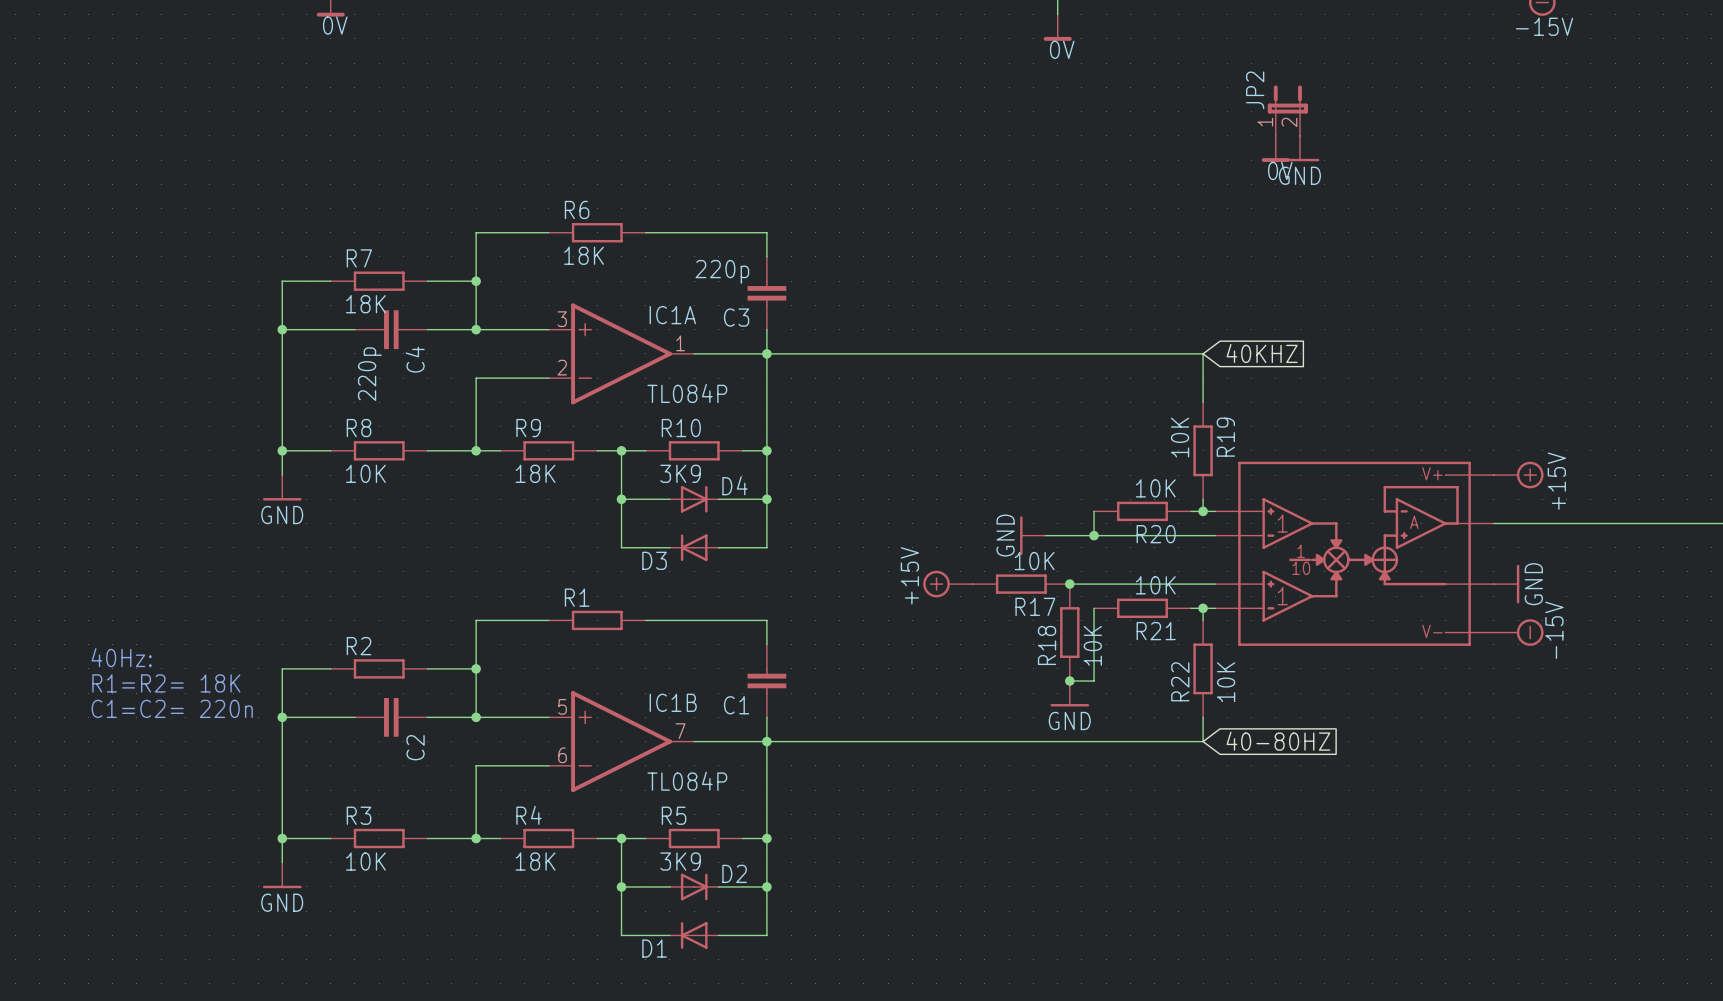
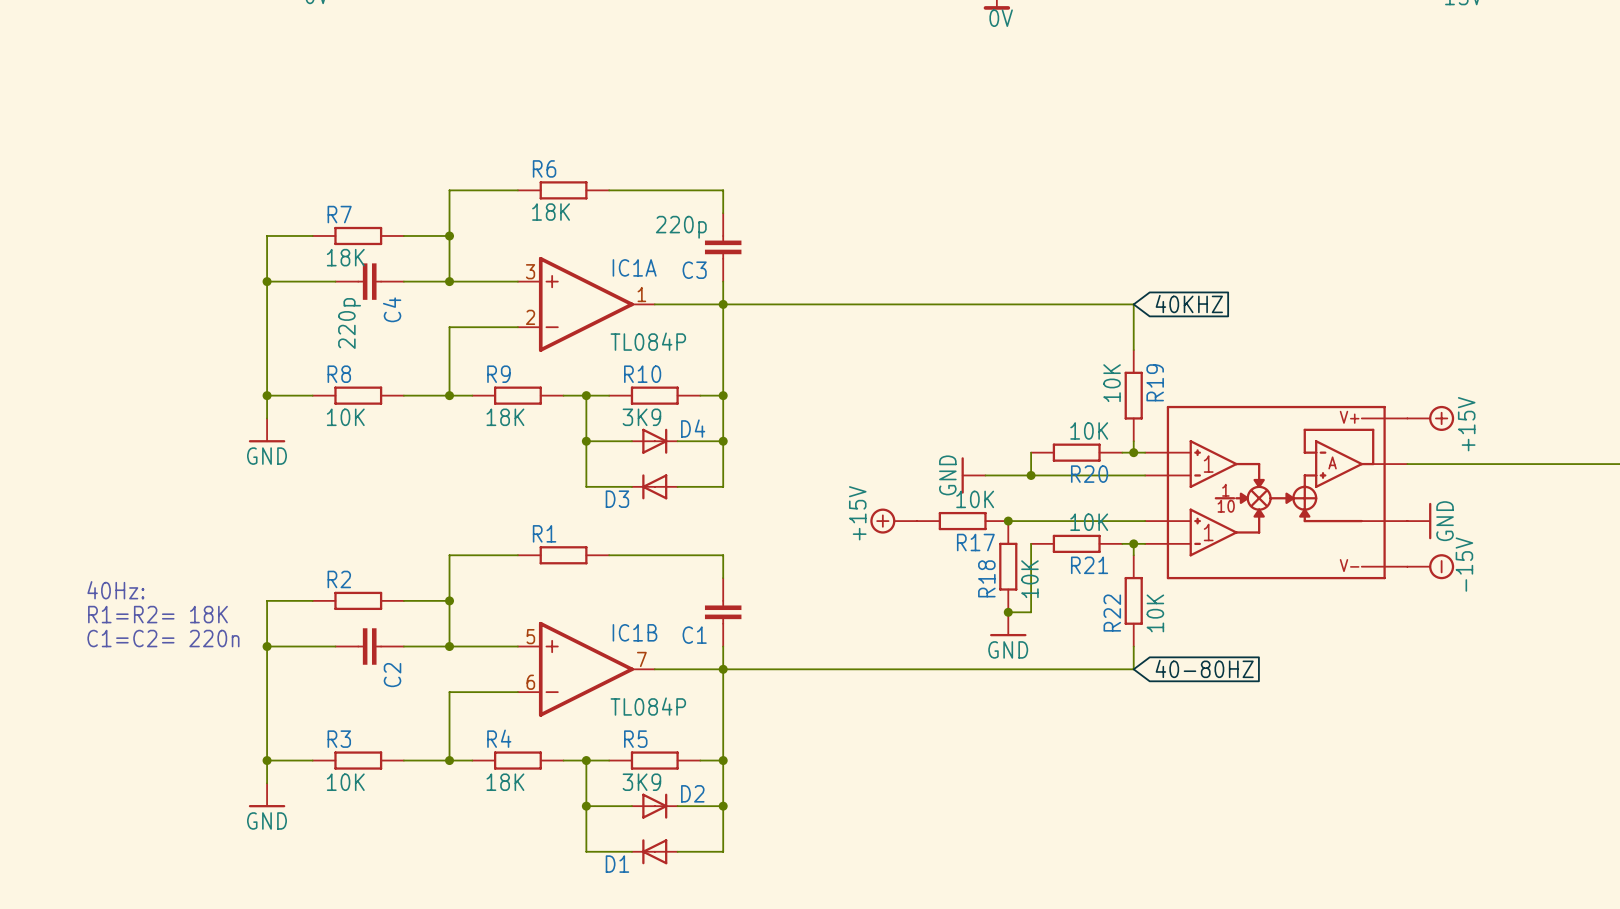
JP2: (1287, 110) -> none
power symbol: 0V (1275, 148) -> none
power symbol: GND (1300, 148) -> none

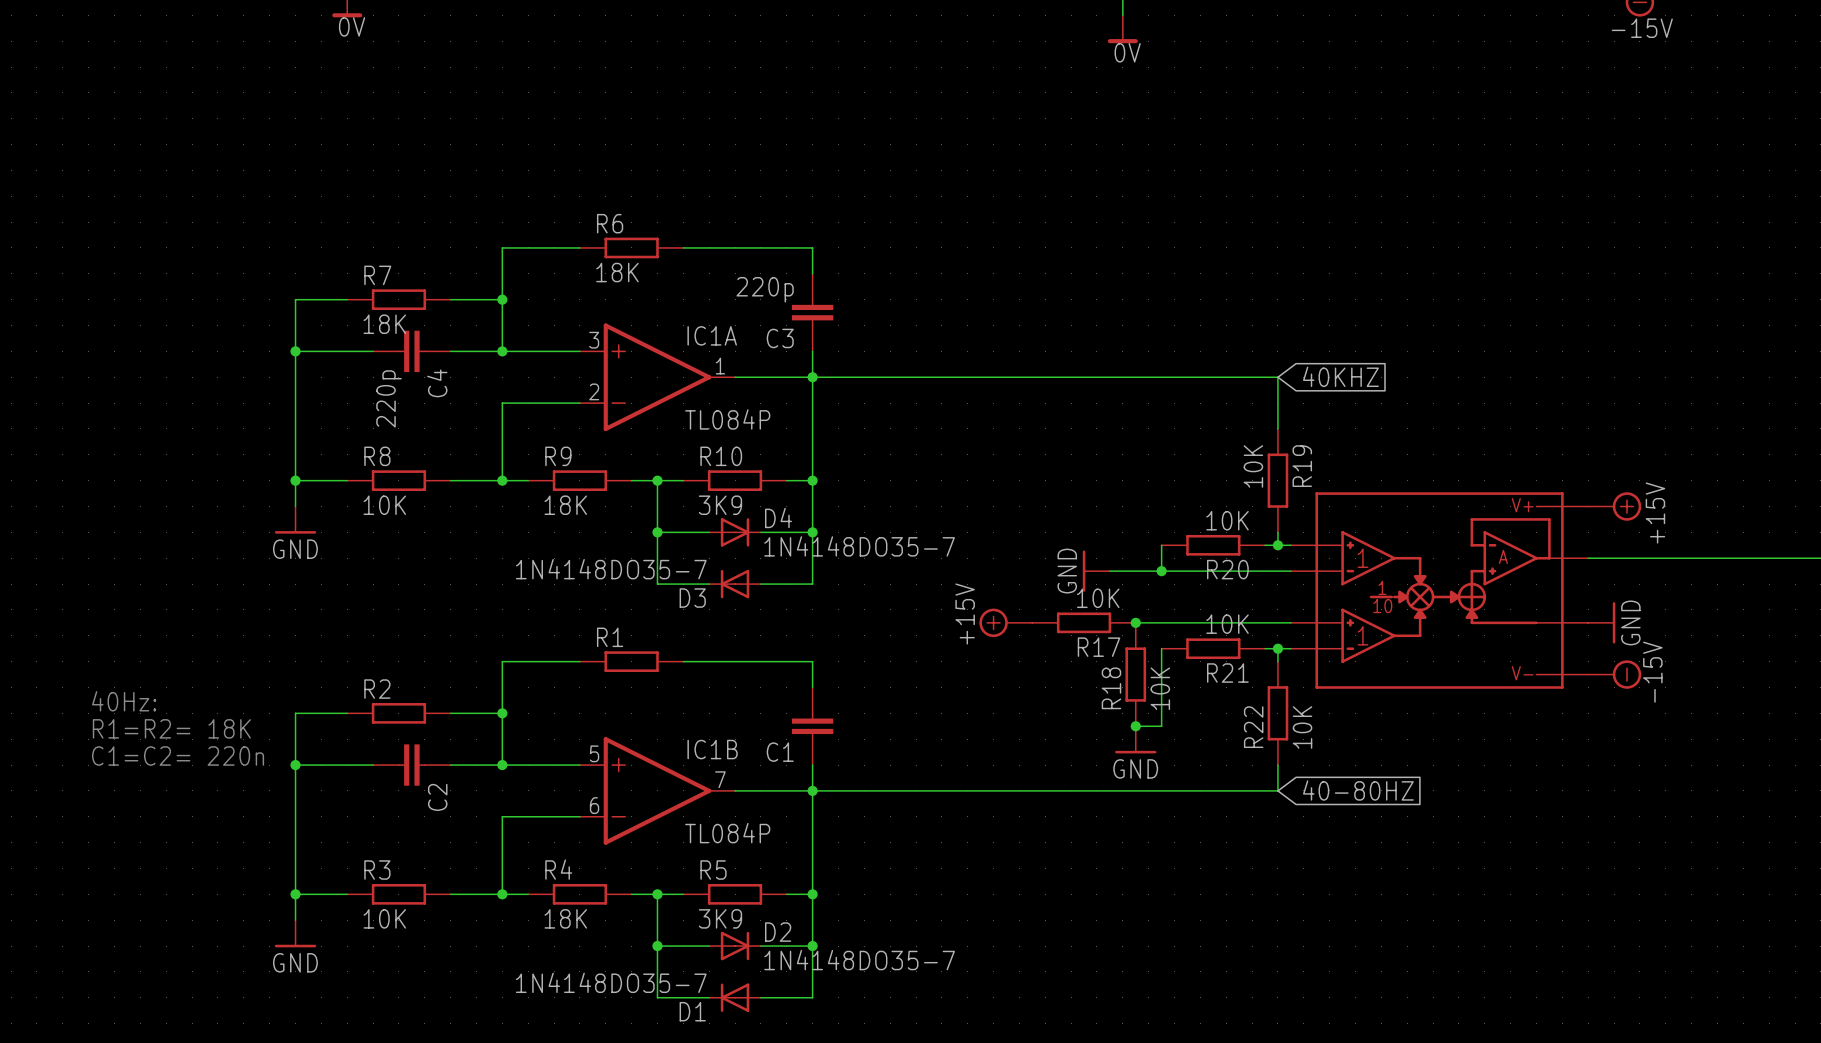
D4 value: none -> 1N4148DO35-7 (859, 546)
D3 value: none -> 1N4148DO35-7 (611, 569)
D2 value: none -> 1N4148DO35-7 (859, 960)
D1 value: none -> 1N4148DO35-7 (611, 982)

